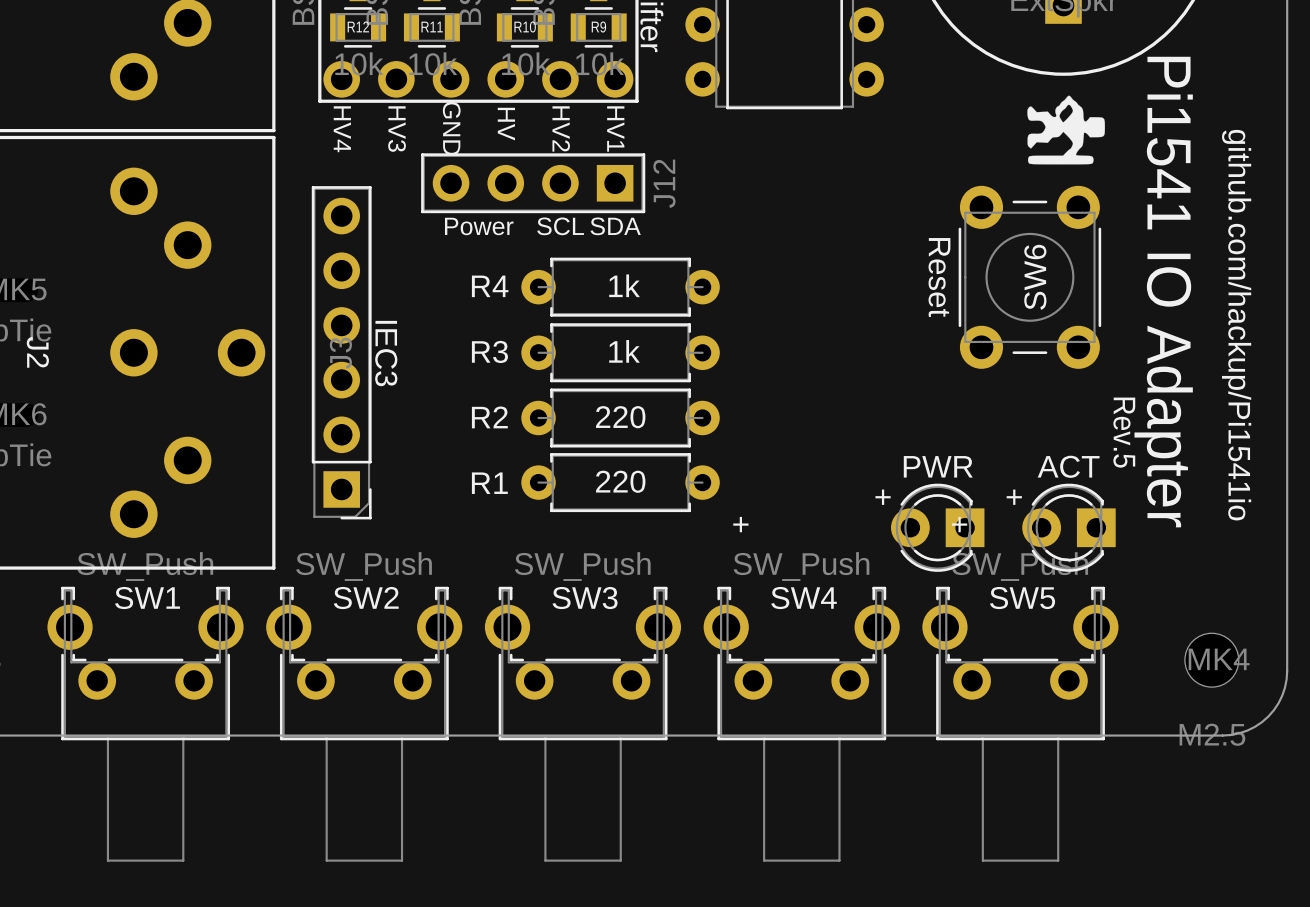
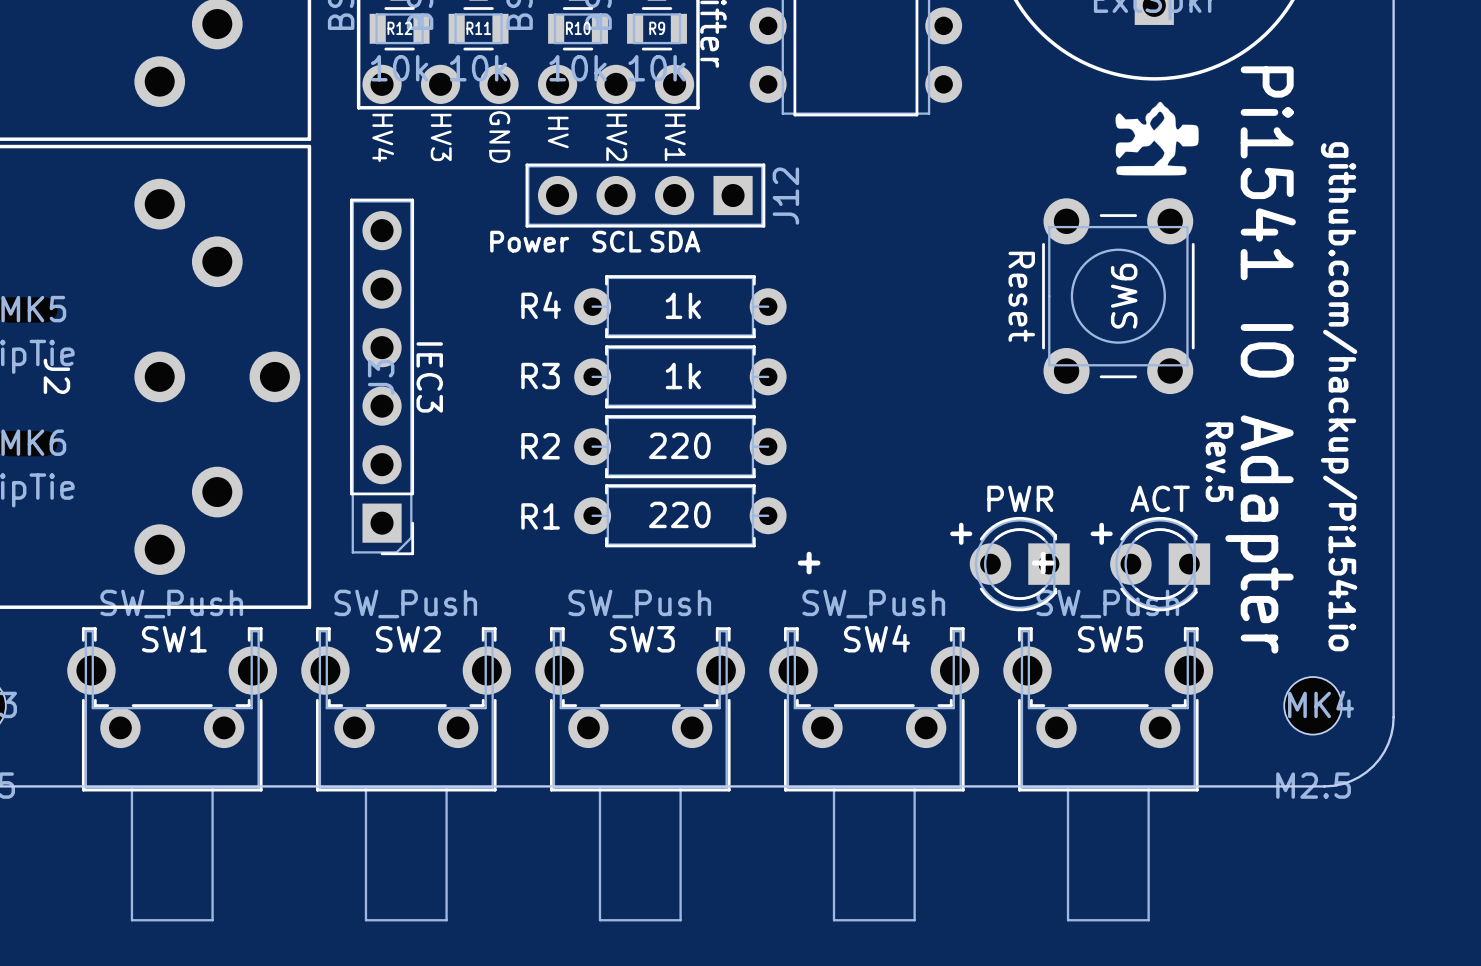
J12 position: (533, 183) -> (645, 195)

